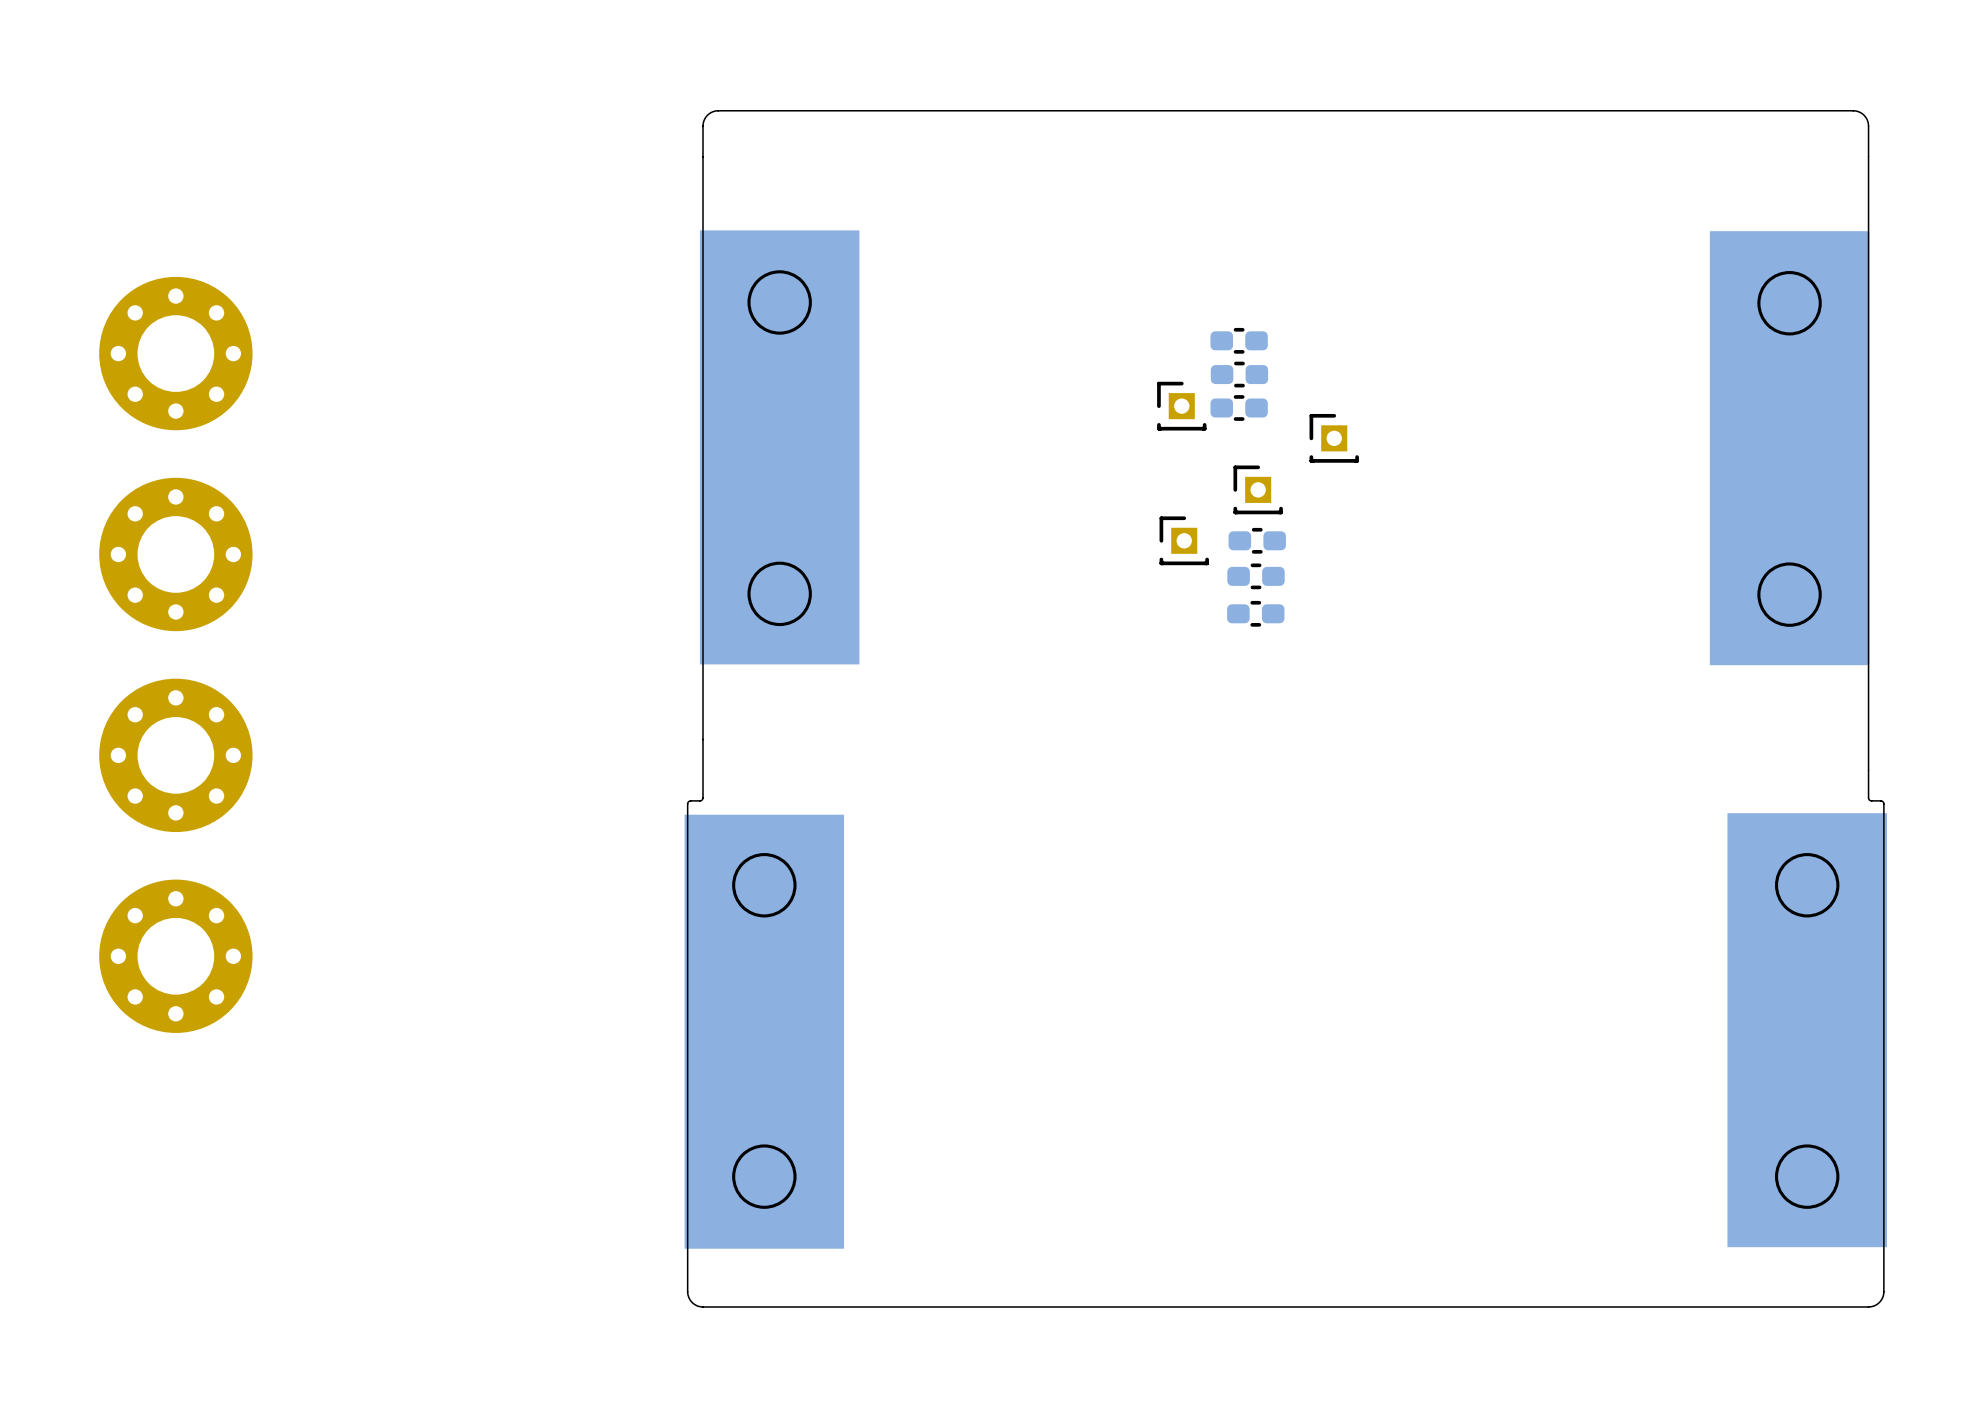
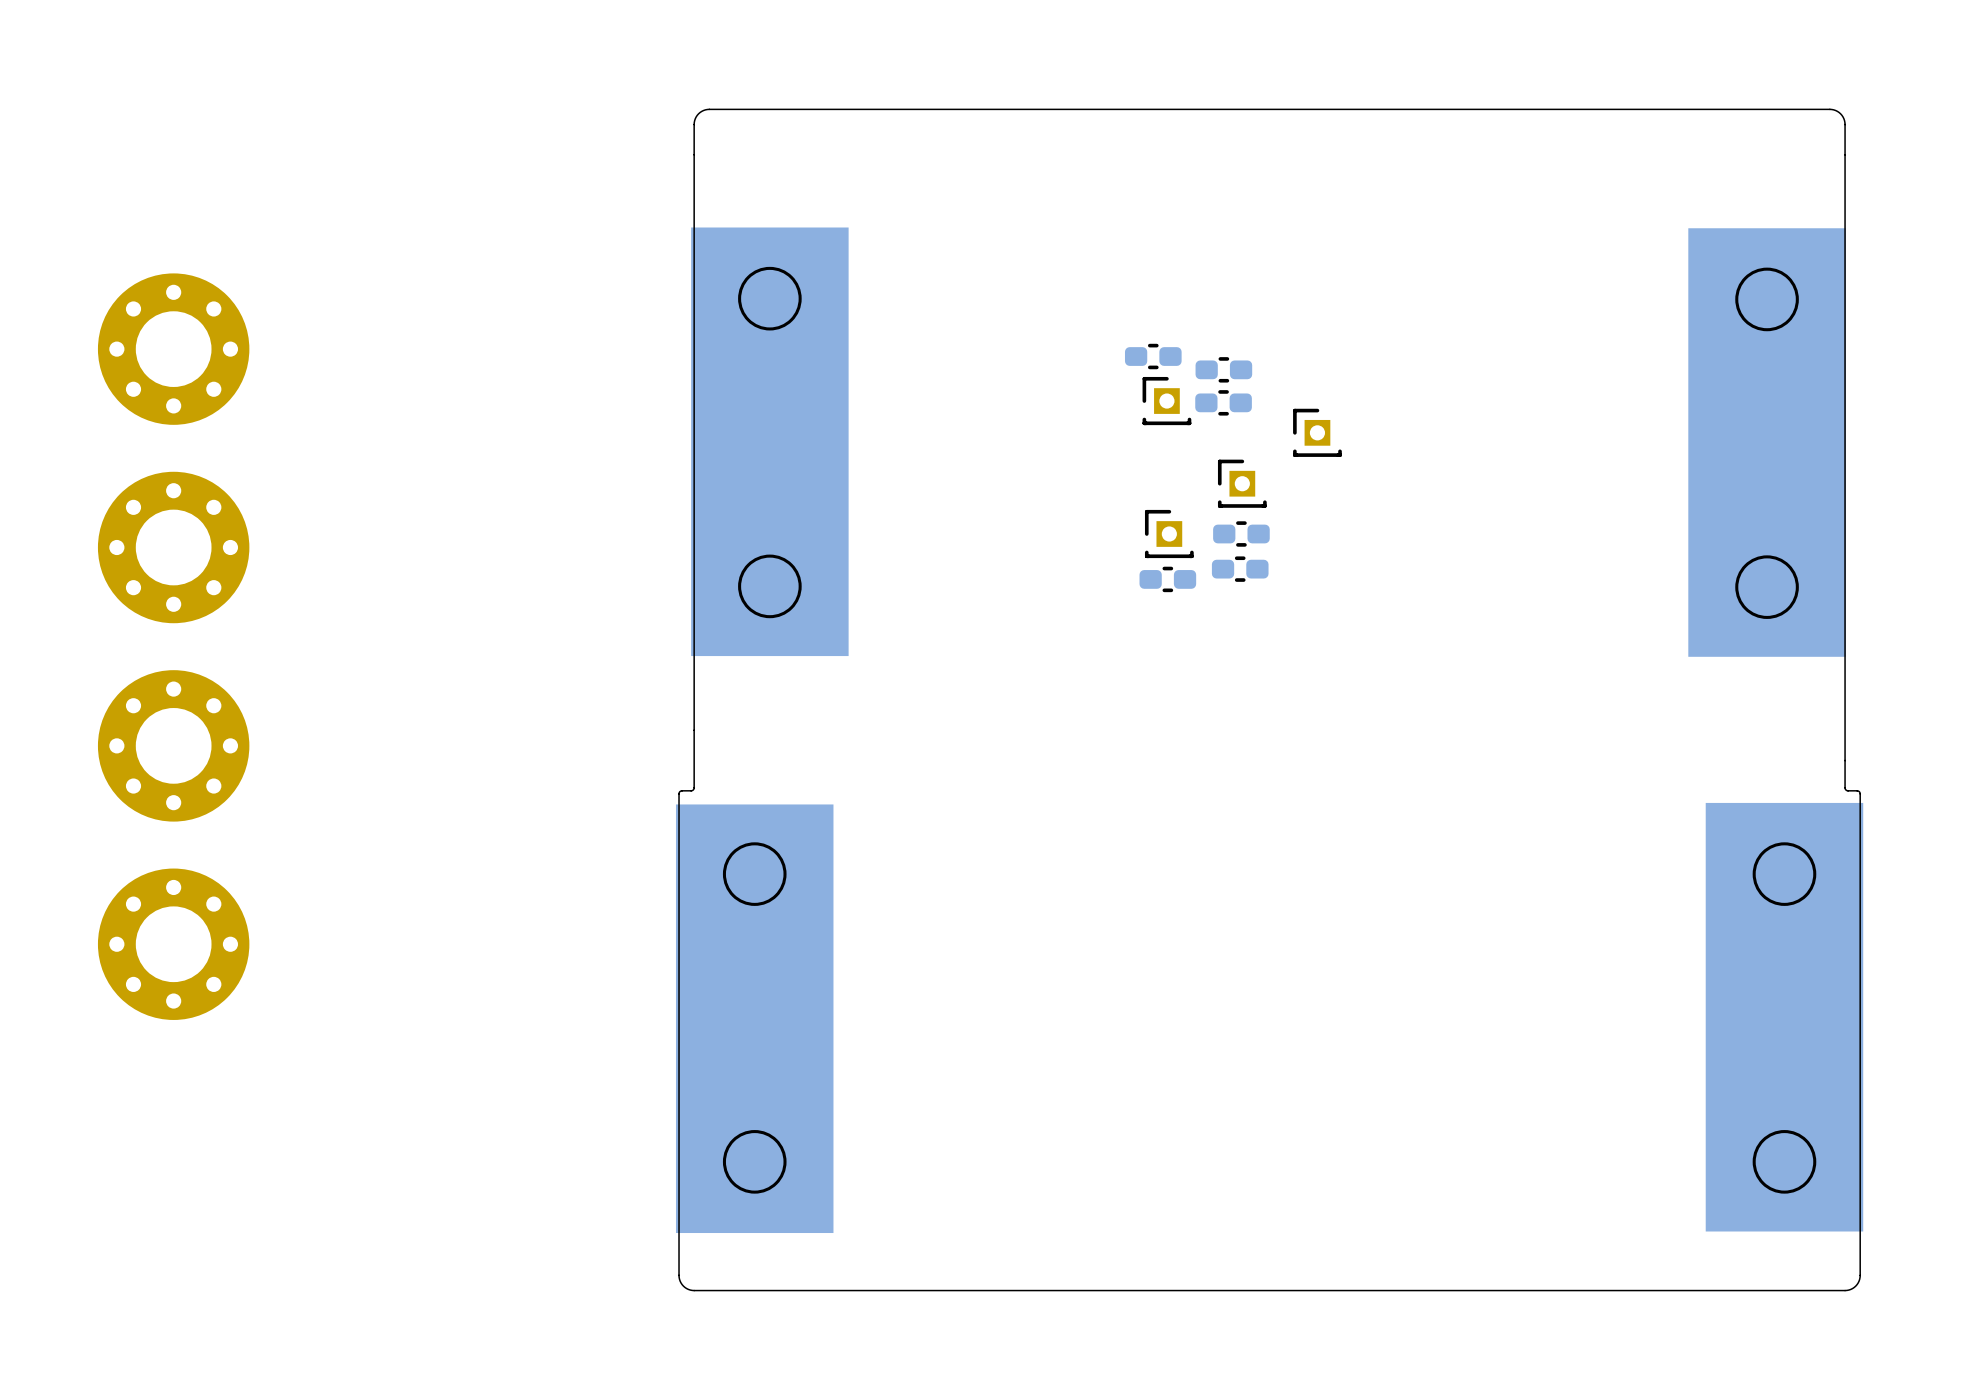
part position: (1239, 340) -> (1153, 356)
part position: (1255, 613) -> (1167, 579)

